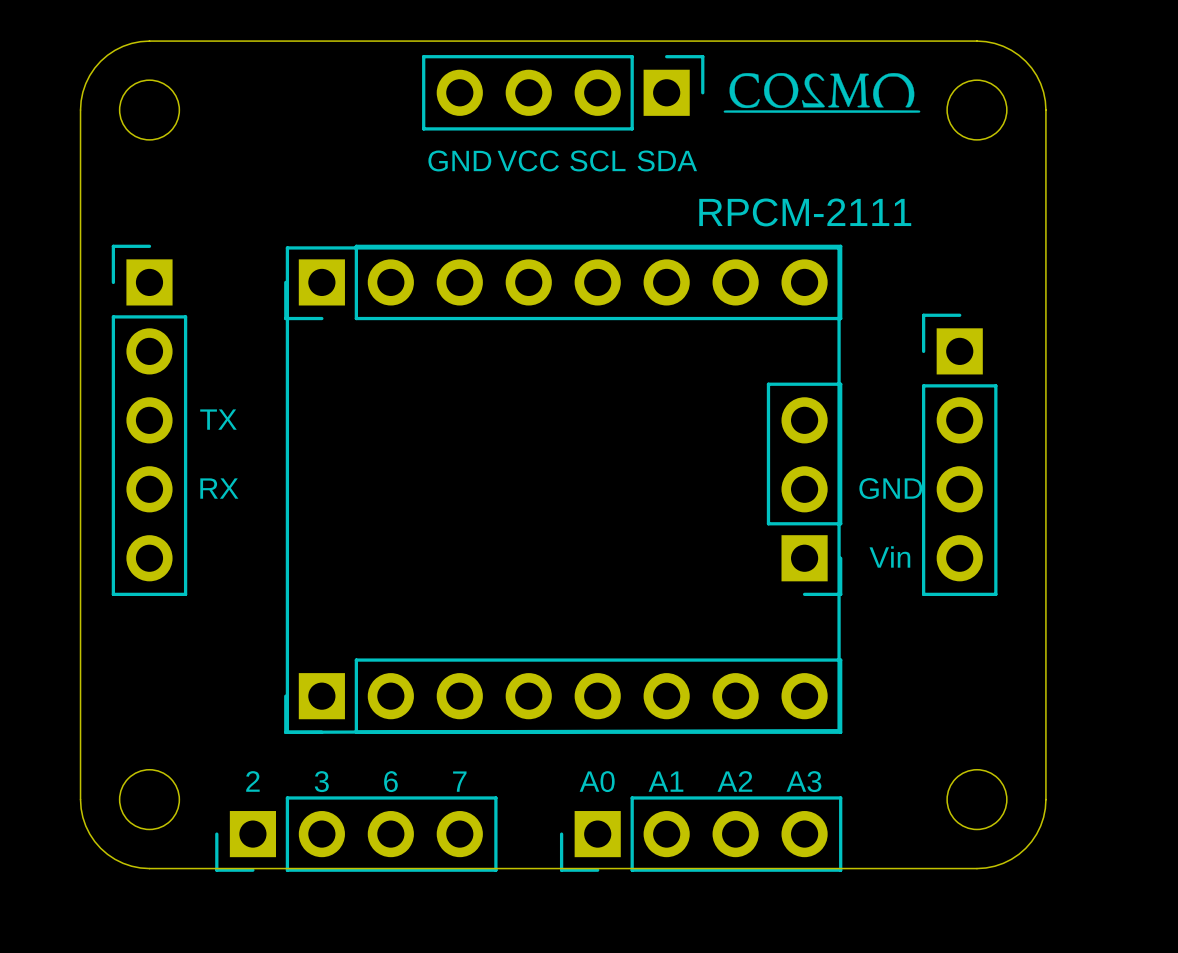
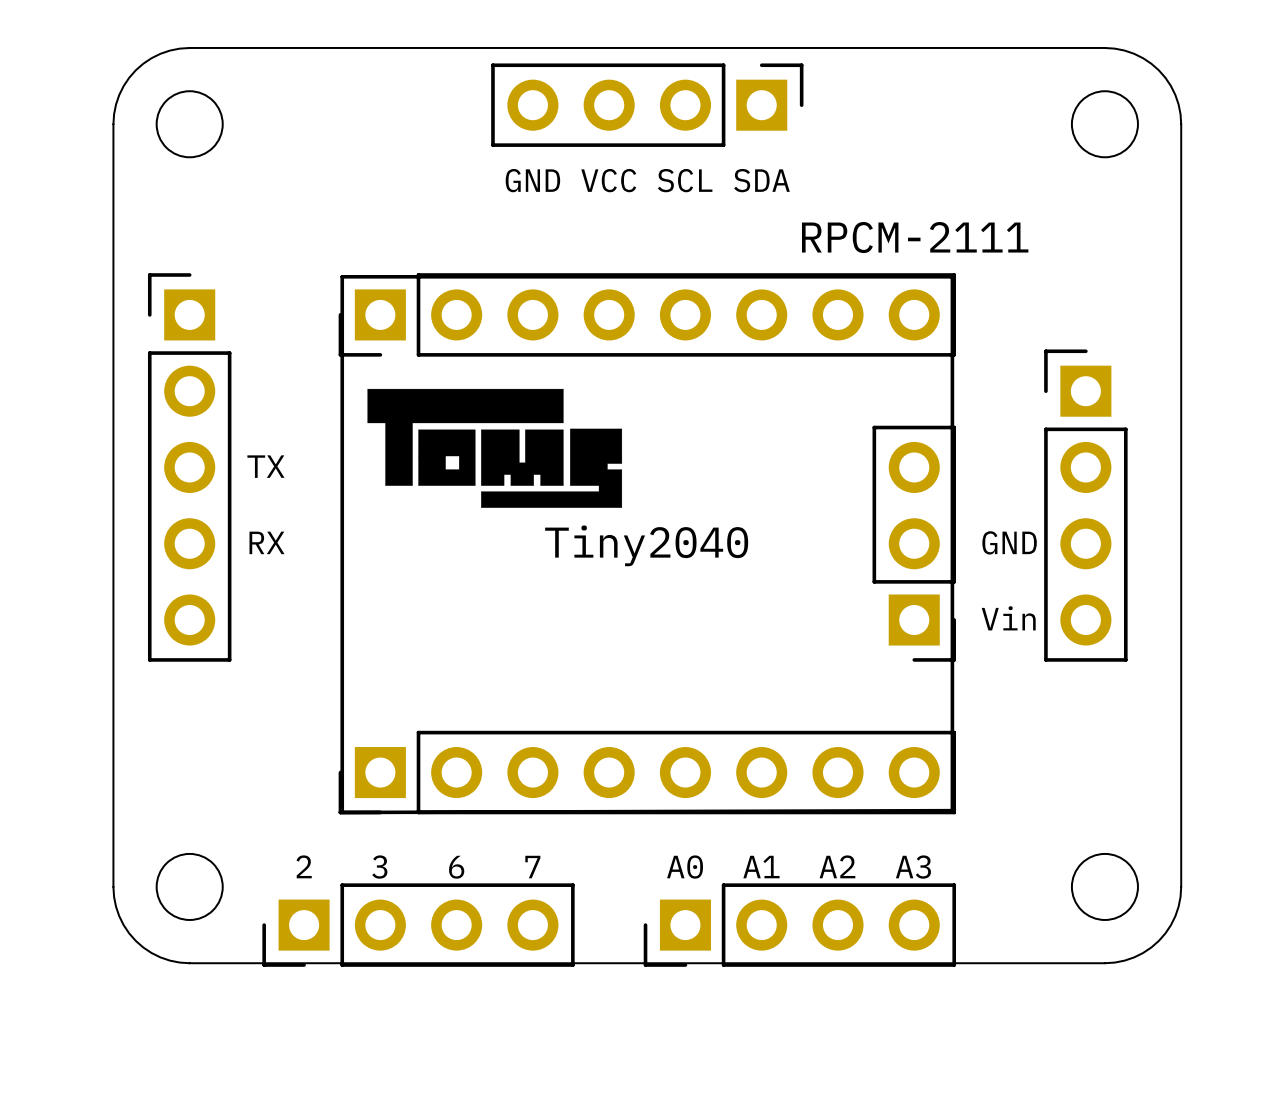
drawing: [723, 73, 921, 113] -> none
drawing: none -> [367, 388, 623, 508]
text: none -> Tiny2040 (646, 545)

